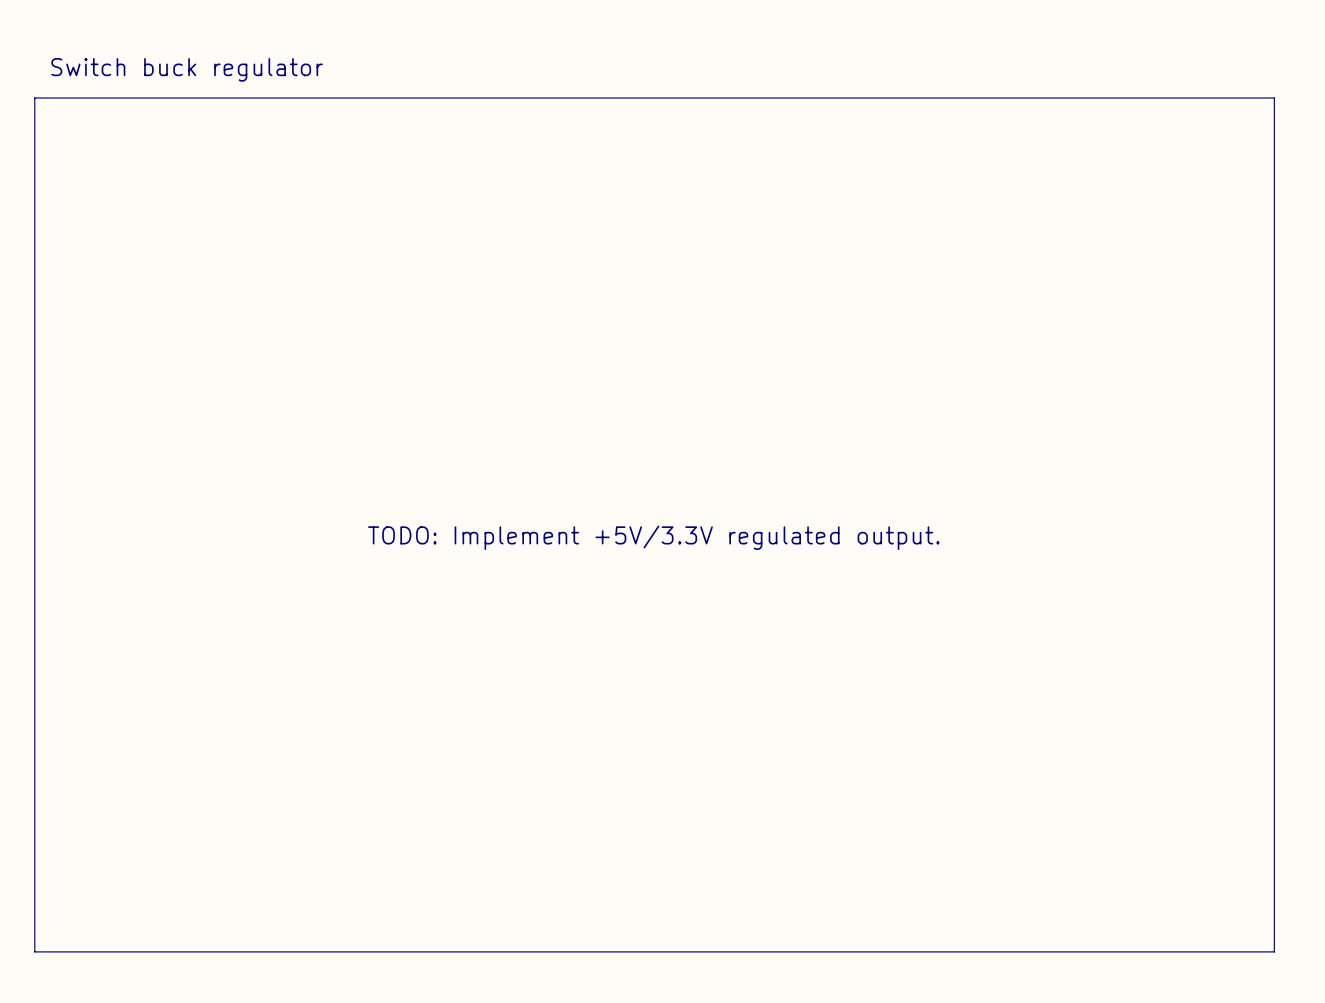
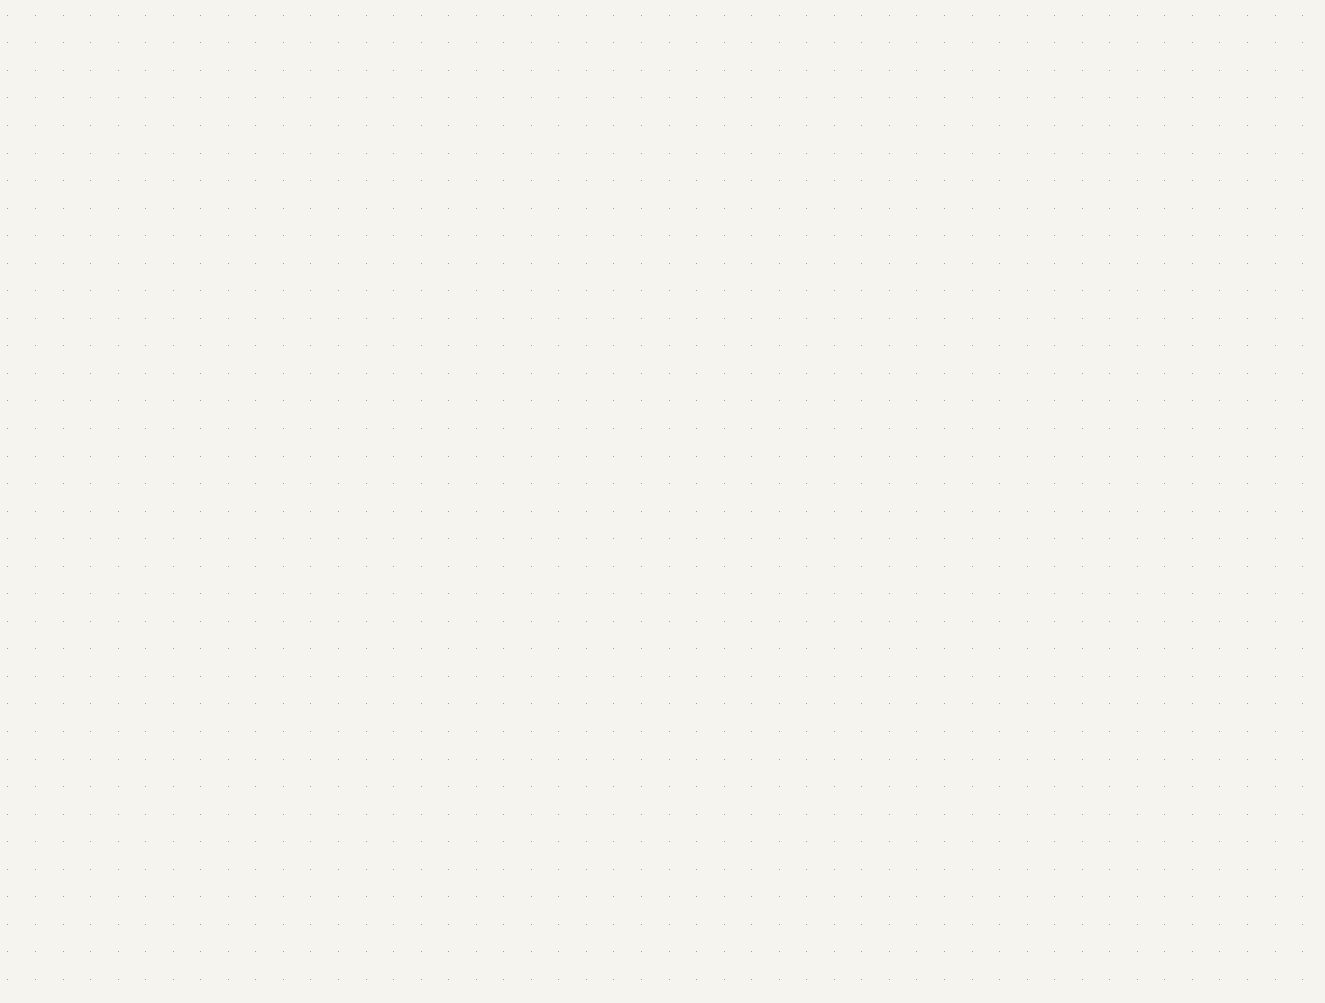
text: Switch buck regulator (187, 69) -> none
line: (34, 97) (1274, 97) (1274, 951) (34, 951) (34, 97) -> none
text: TODO: Implement +5V/3.3V regulated output. (653, 537) -> none

